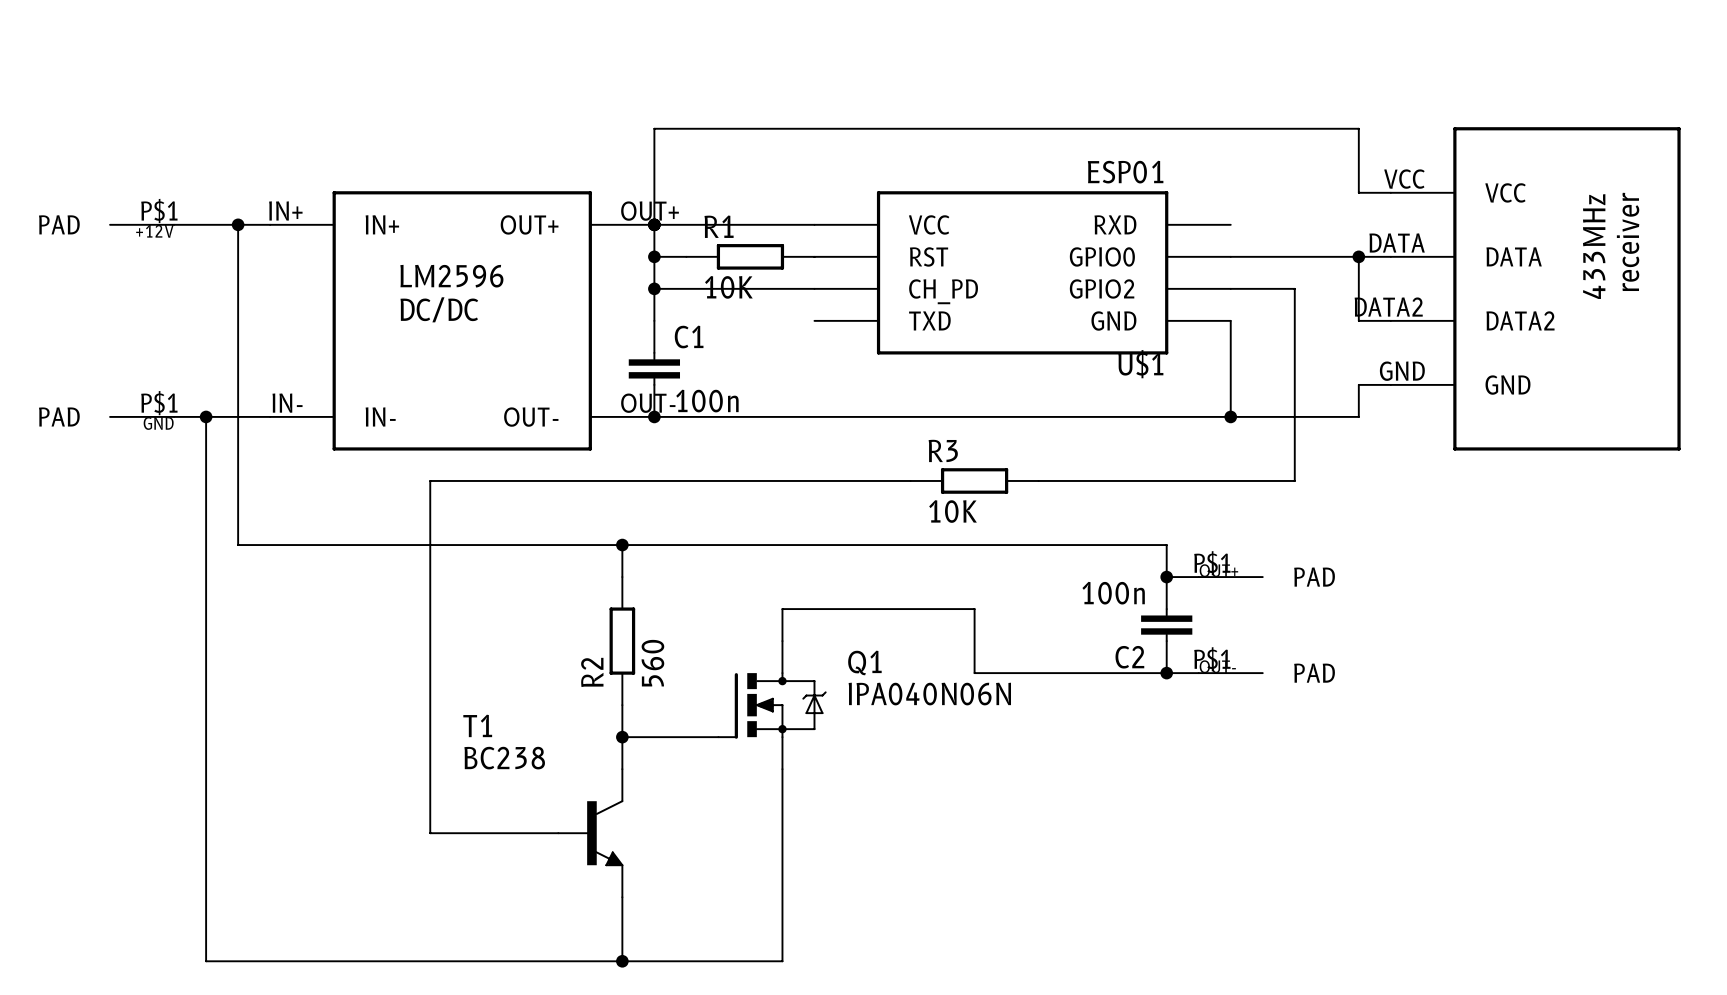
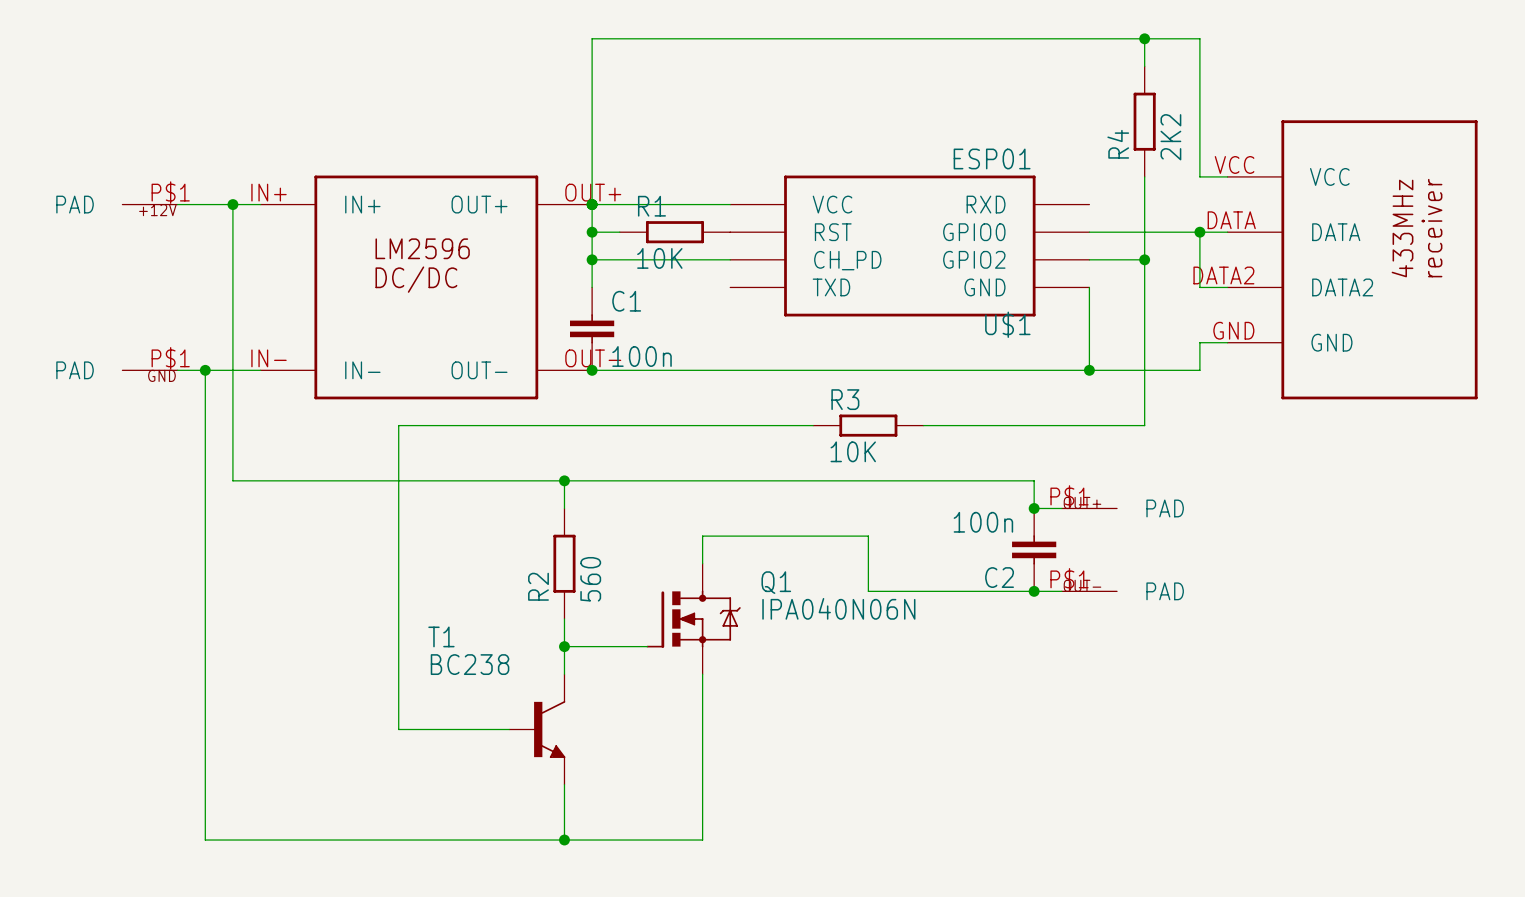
wire: none -> (1144, 38) (1144, 66)
junction: none -> (1144, 38)
wire: (654, 128) (1358, 128) -> (592, 121) (592, 38) (1199, 38) (1199, 121)
R4: none -> 2K2 (1144, 121)
wire: none -> (1144, 176) (1144, 259)
junction: none -> (1144, 259)

